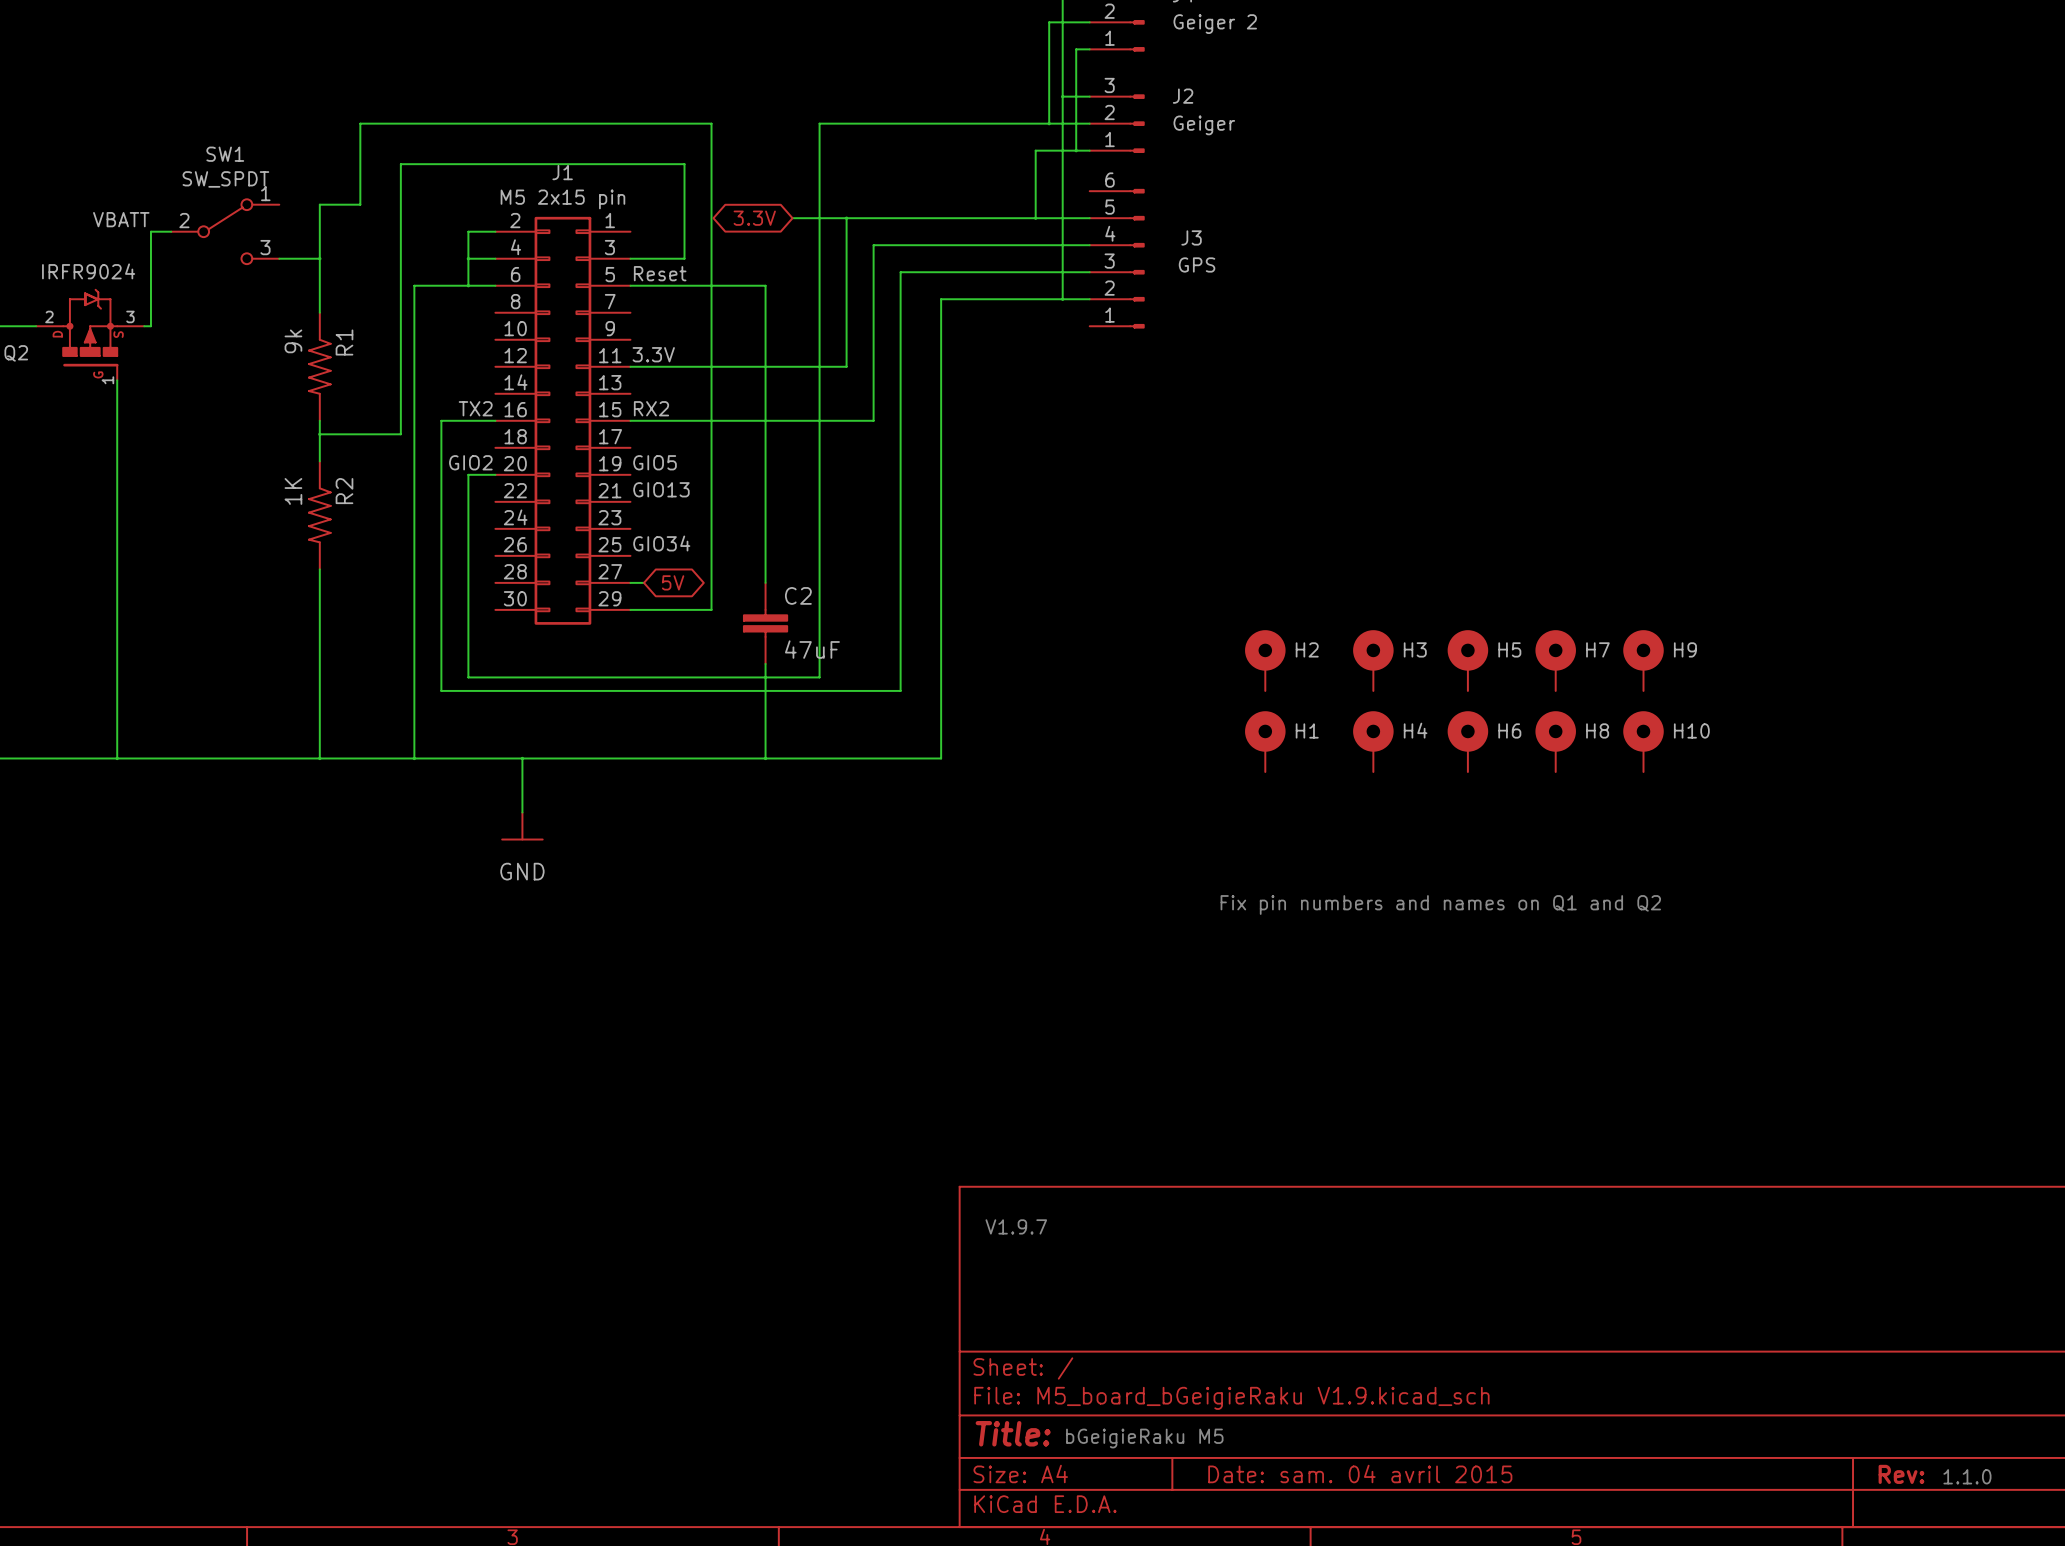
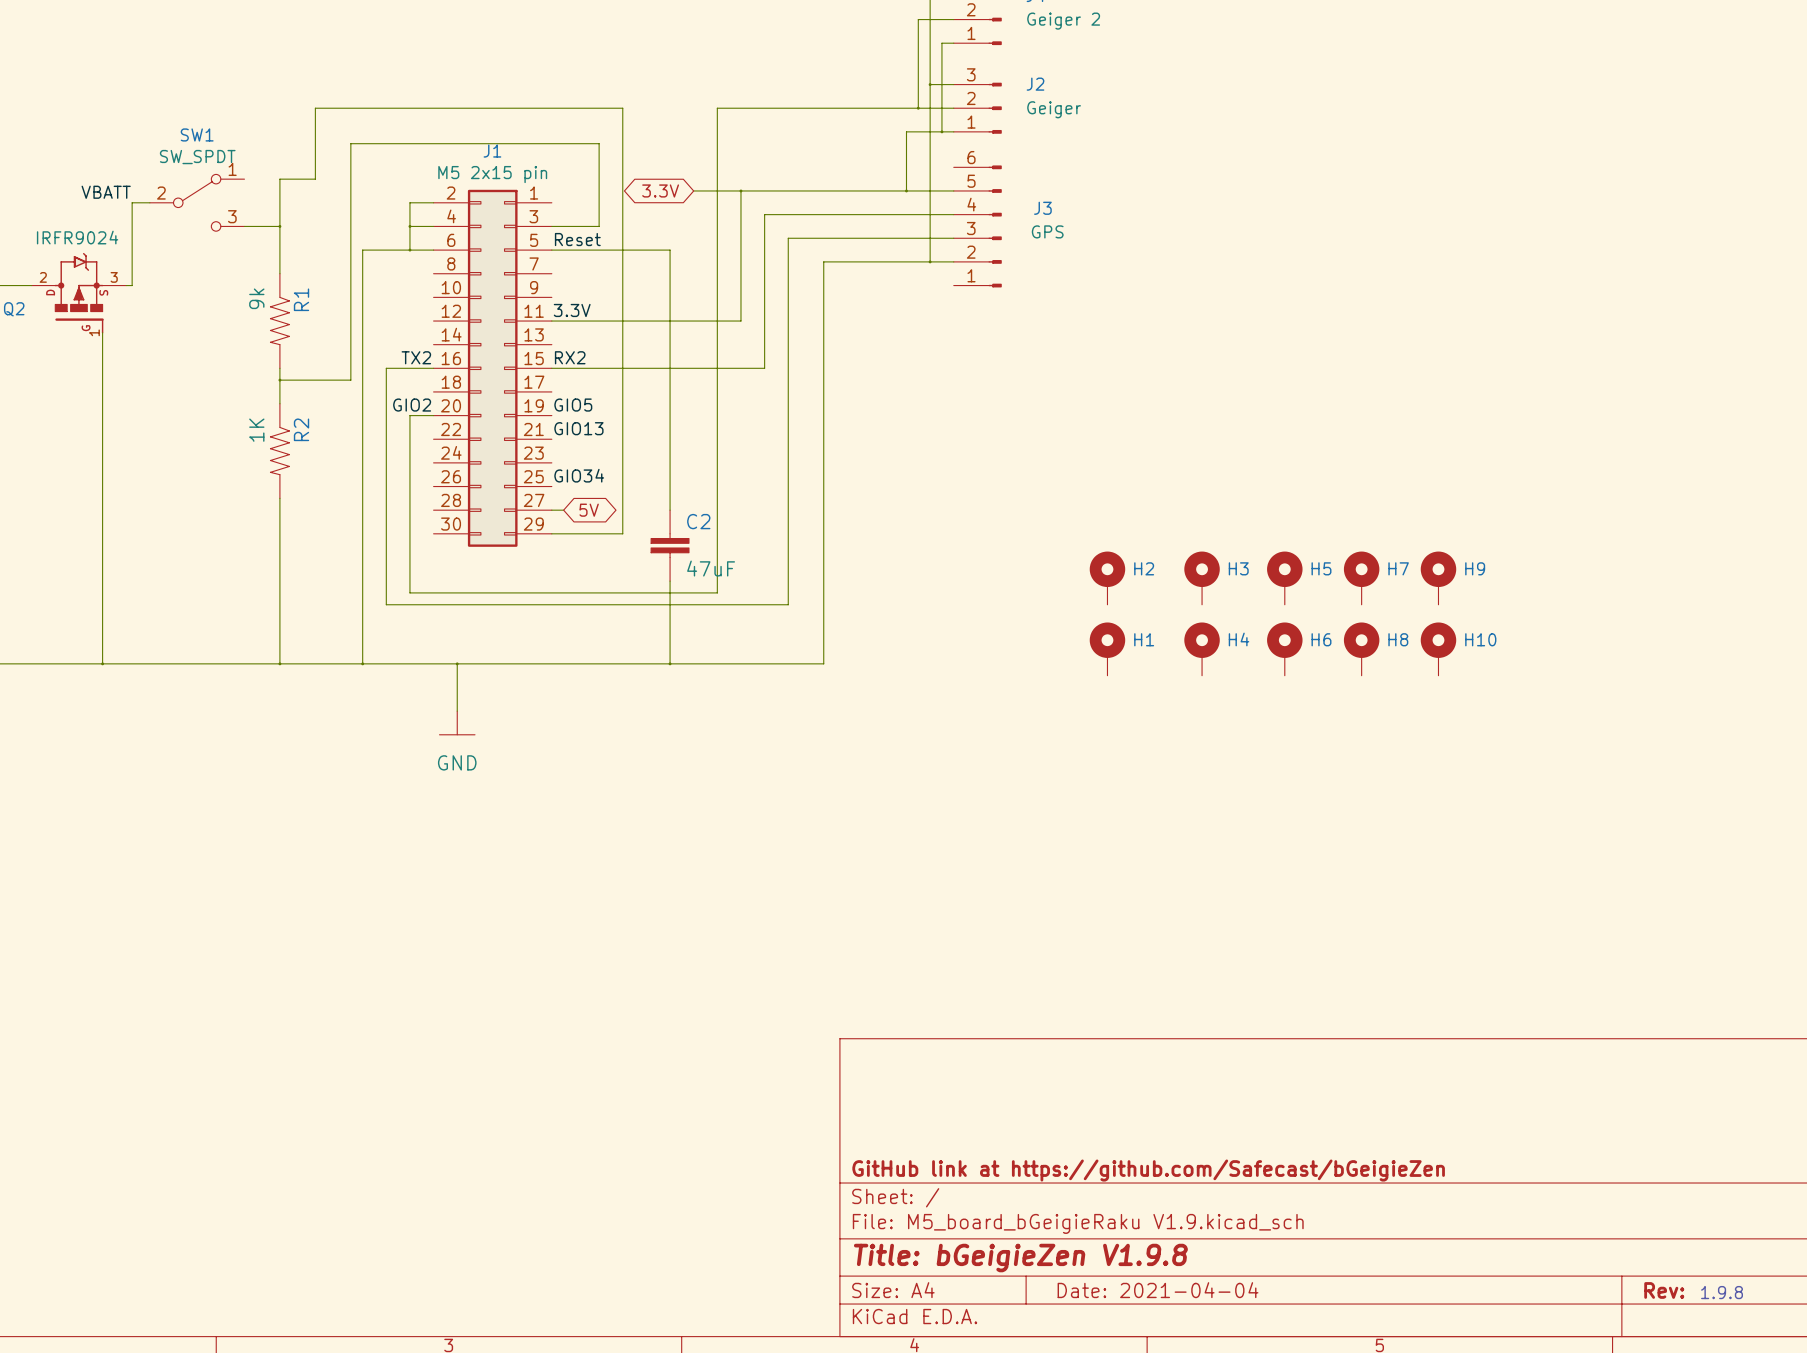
text: Fix pin numbers and names on Q1 and Q2 (1440, 904) -> none
text: V1.9.7 (1016, 1226) -> none
title block: none -> GitHub link at https://github.com/Safecast/bGeigieZen (1148, 1170)
title block: Title: (1013, 1433) -> Title: bGeigieZen V1.9.8 (1020, 1258)
text: bGeigieRaku M5 (1144, 1438) -> none
title block: Date: sam. 04 avril 2015 (1360, 1474) -> Date: 2021-04-04 (1158, 1290)
text: 1.1.0 (1967, 1476) -> 1.9.8 (1722, 1292)

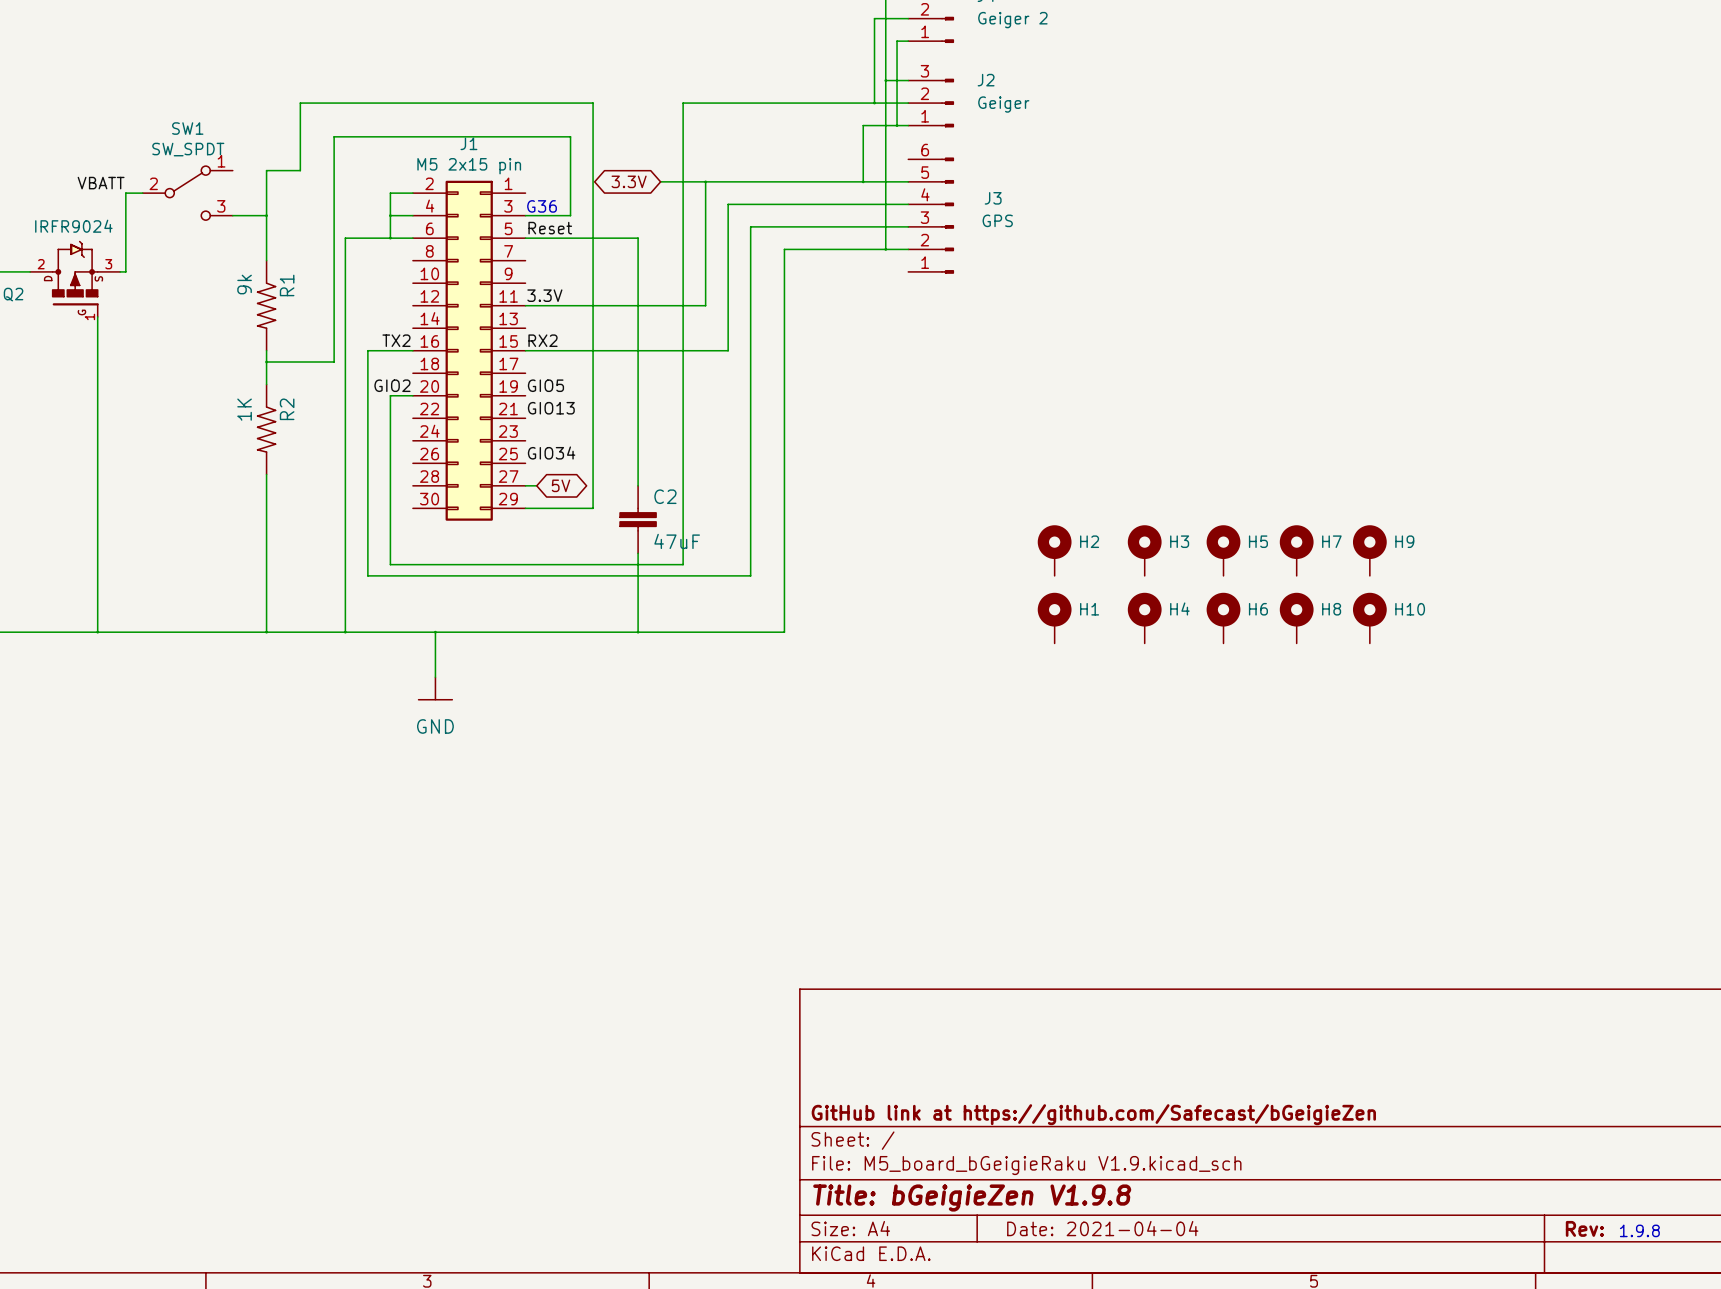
text: none -> G36 (542, 206)

